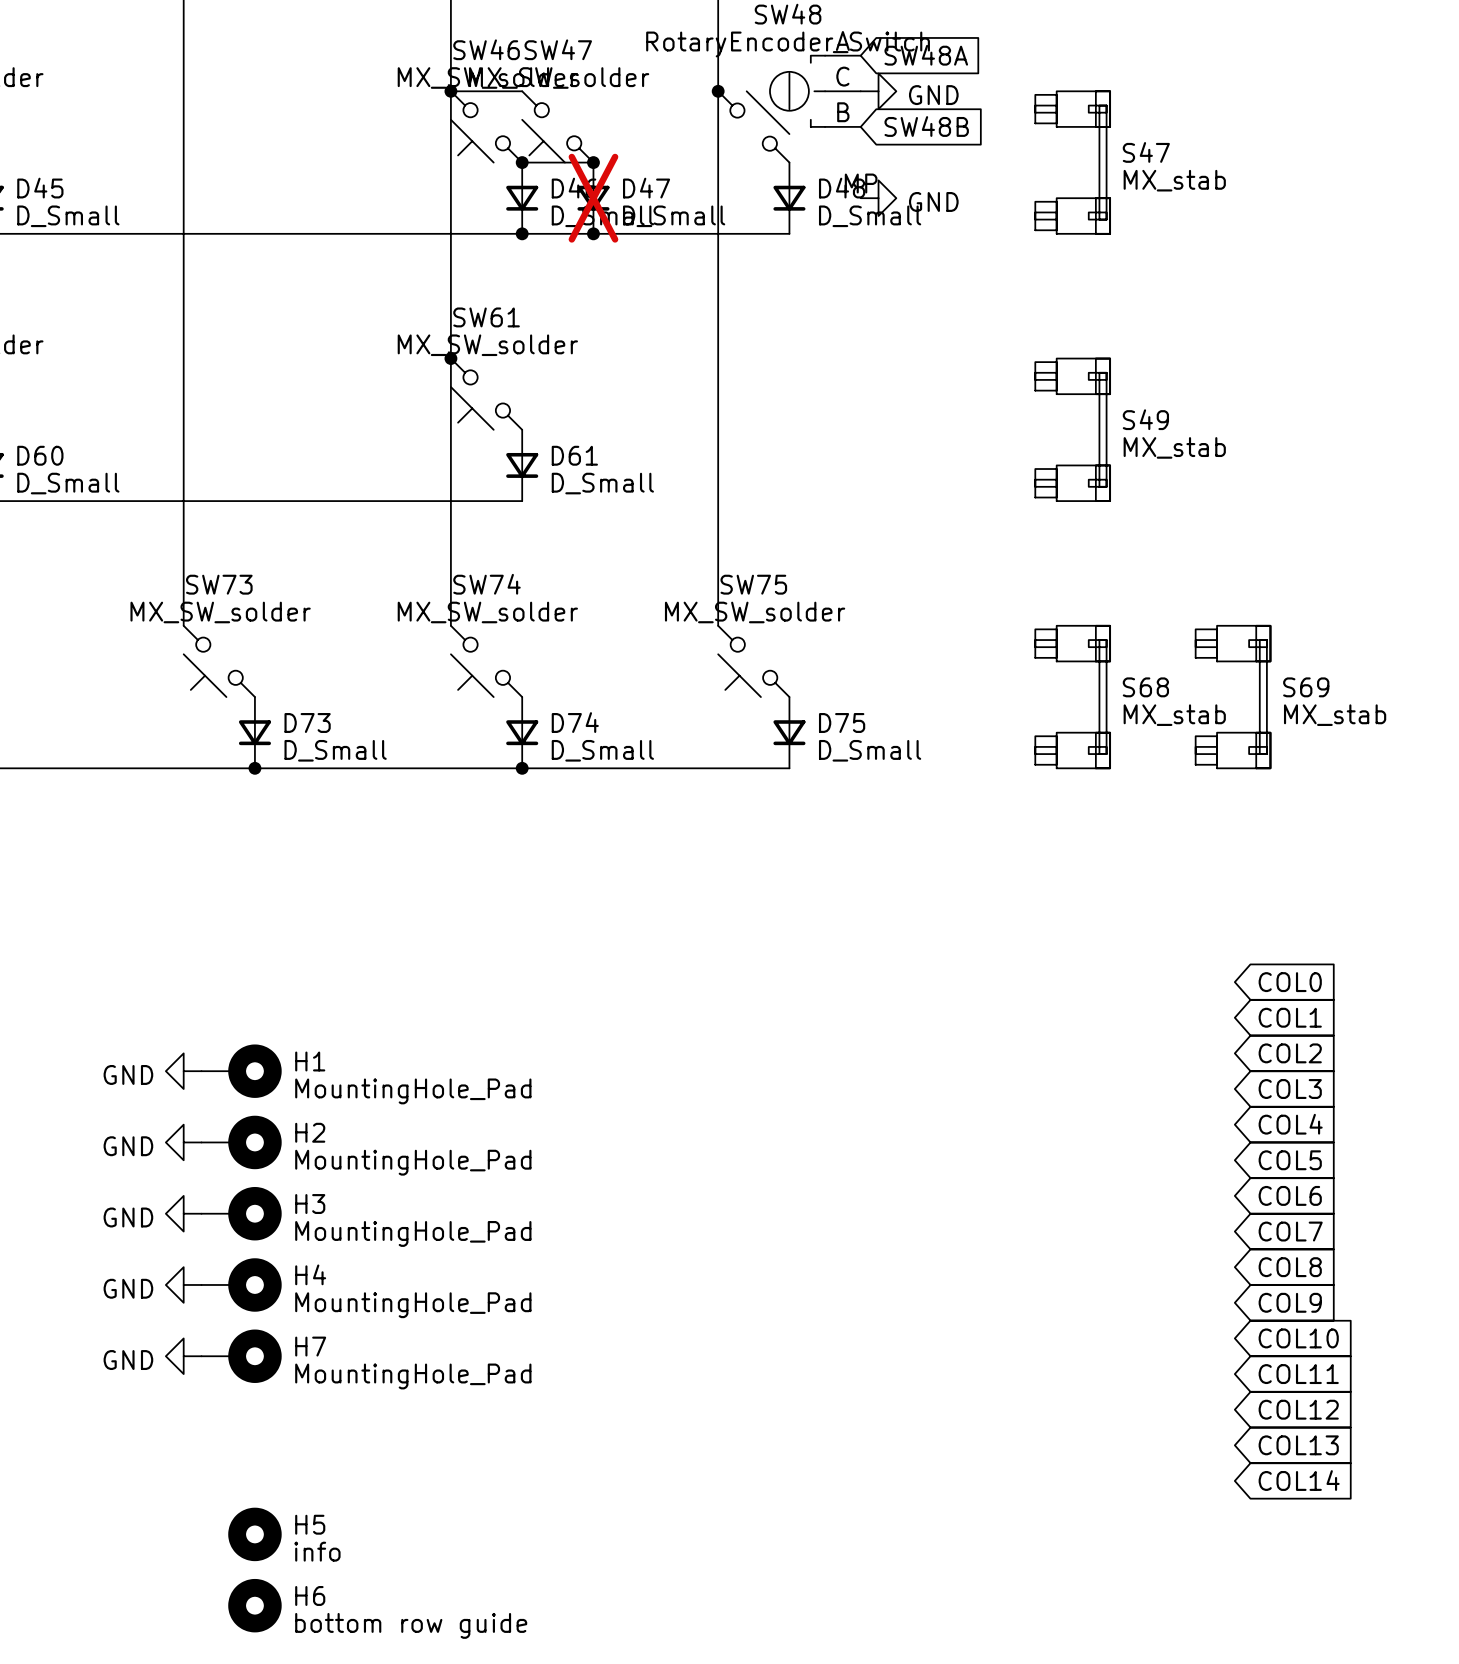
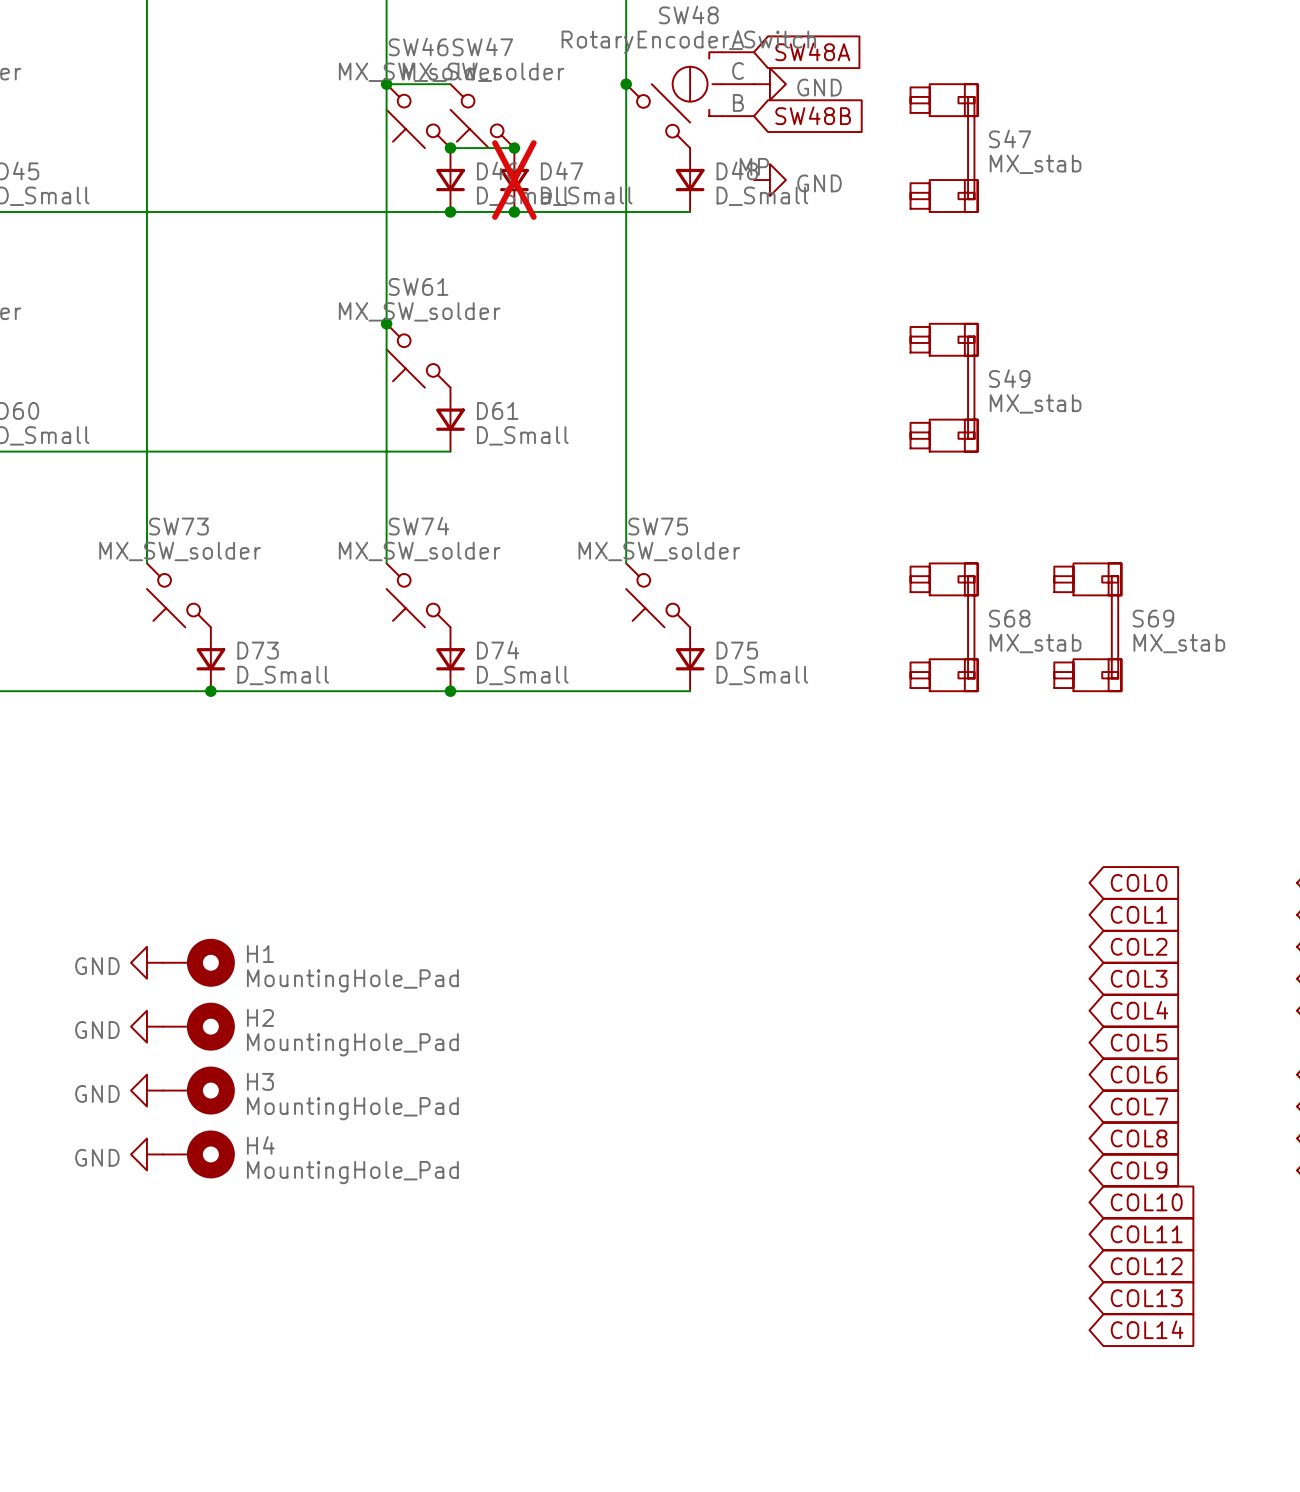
power symbol: GND (183, 1356) -> none
H7: MountingHole_Pad (241, 1356) -> none
H5: info (254, 1534) -> none
H6: bottom row guide (254, 1605) -> none

